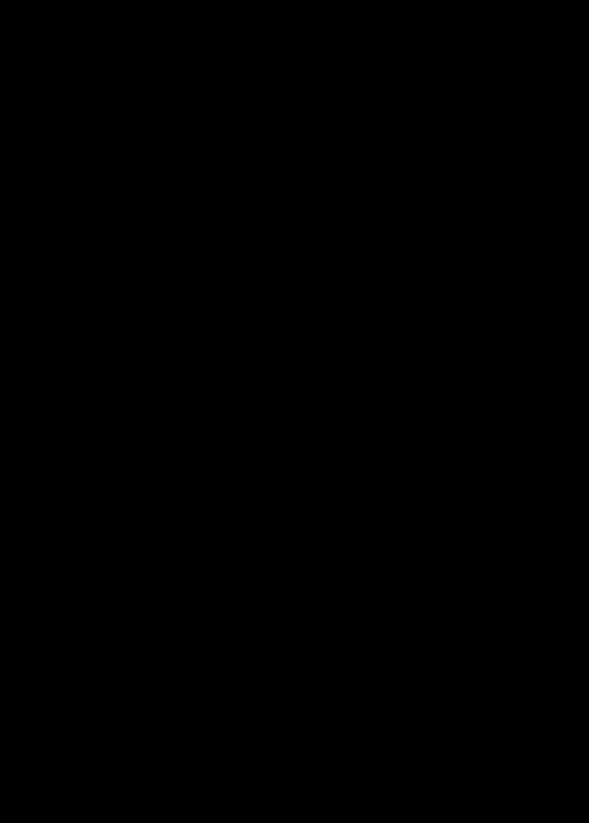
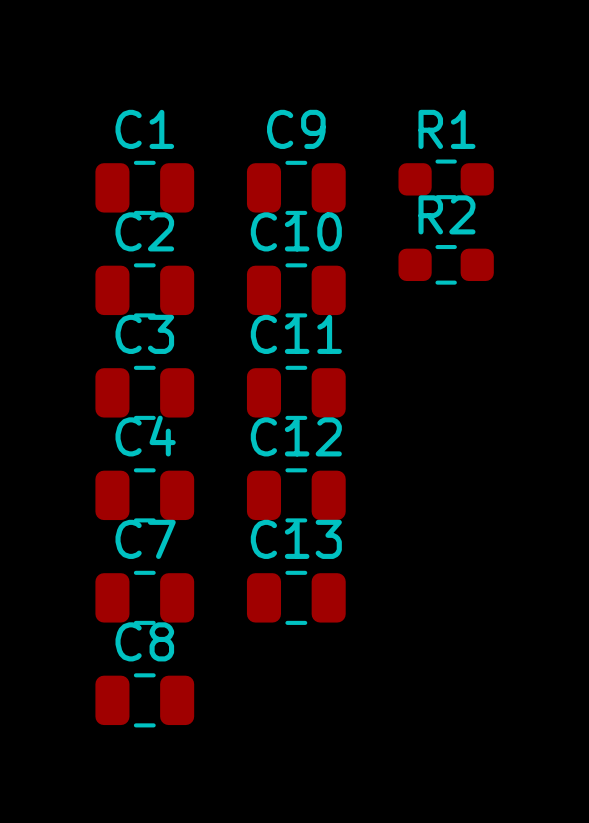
R1: none -> (446, 179)
C1: none -> (144, 187)
C9: none -> (296, 187)
R2: none -> (446, 264)
C2: none -> (144, 290)
C10: none -> (296, 290)
C3: none -> (144, 392)
C11: none -> (296, 392)
C4: none -> (144, 495)
C12: none -> (296, 495)
C7: none -> (144, 597)
C13: none -> (296, 597)
C8: none -> (144, 700)

